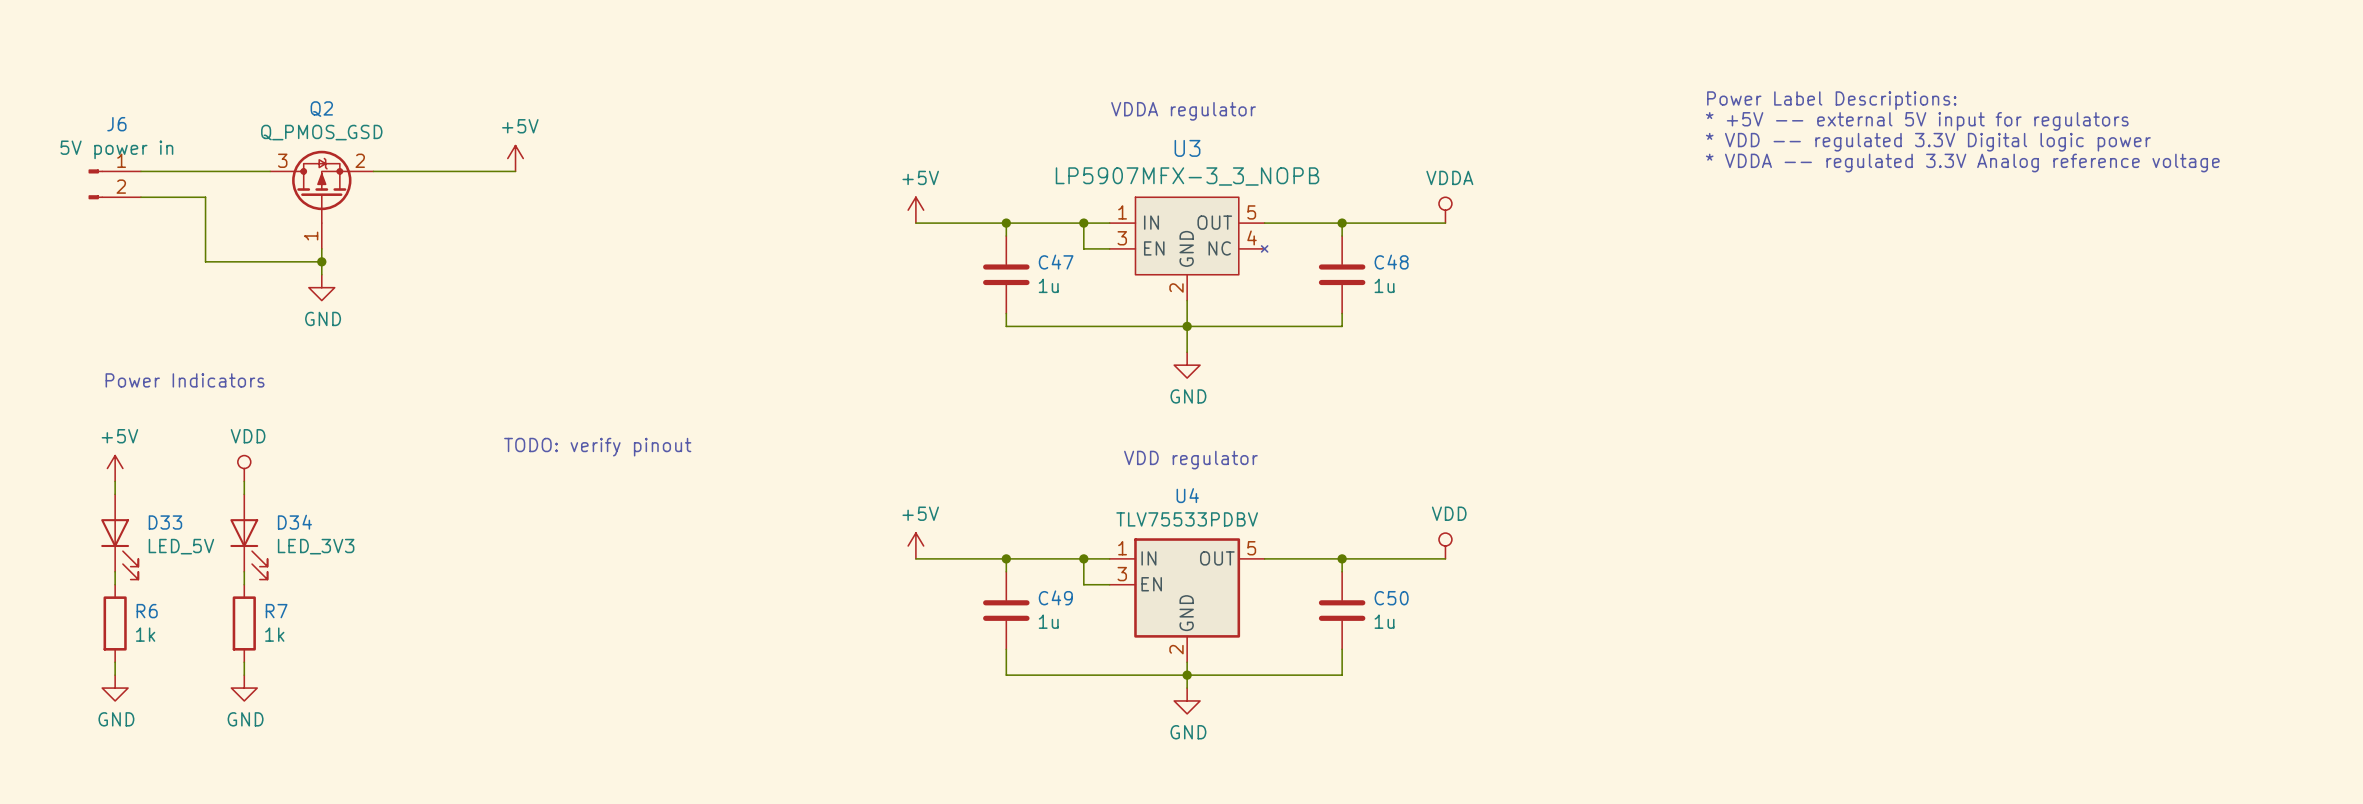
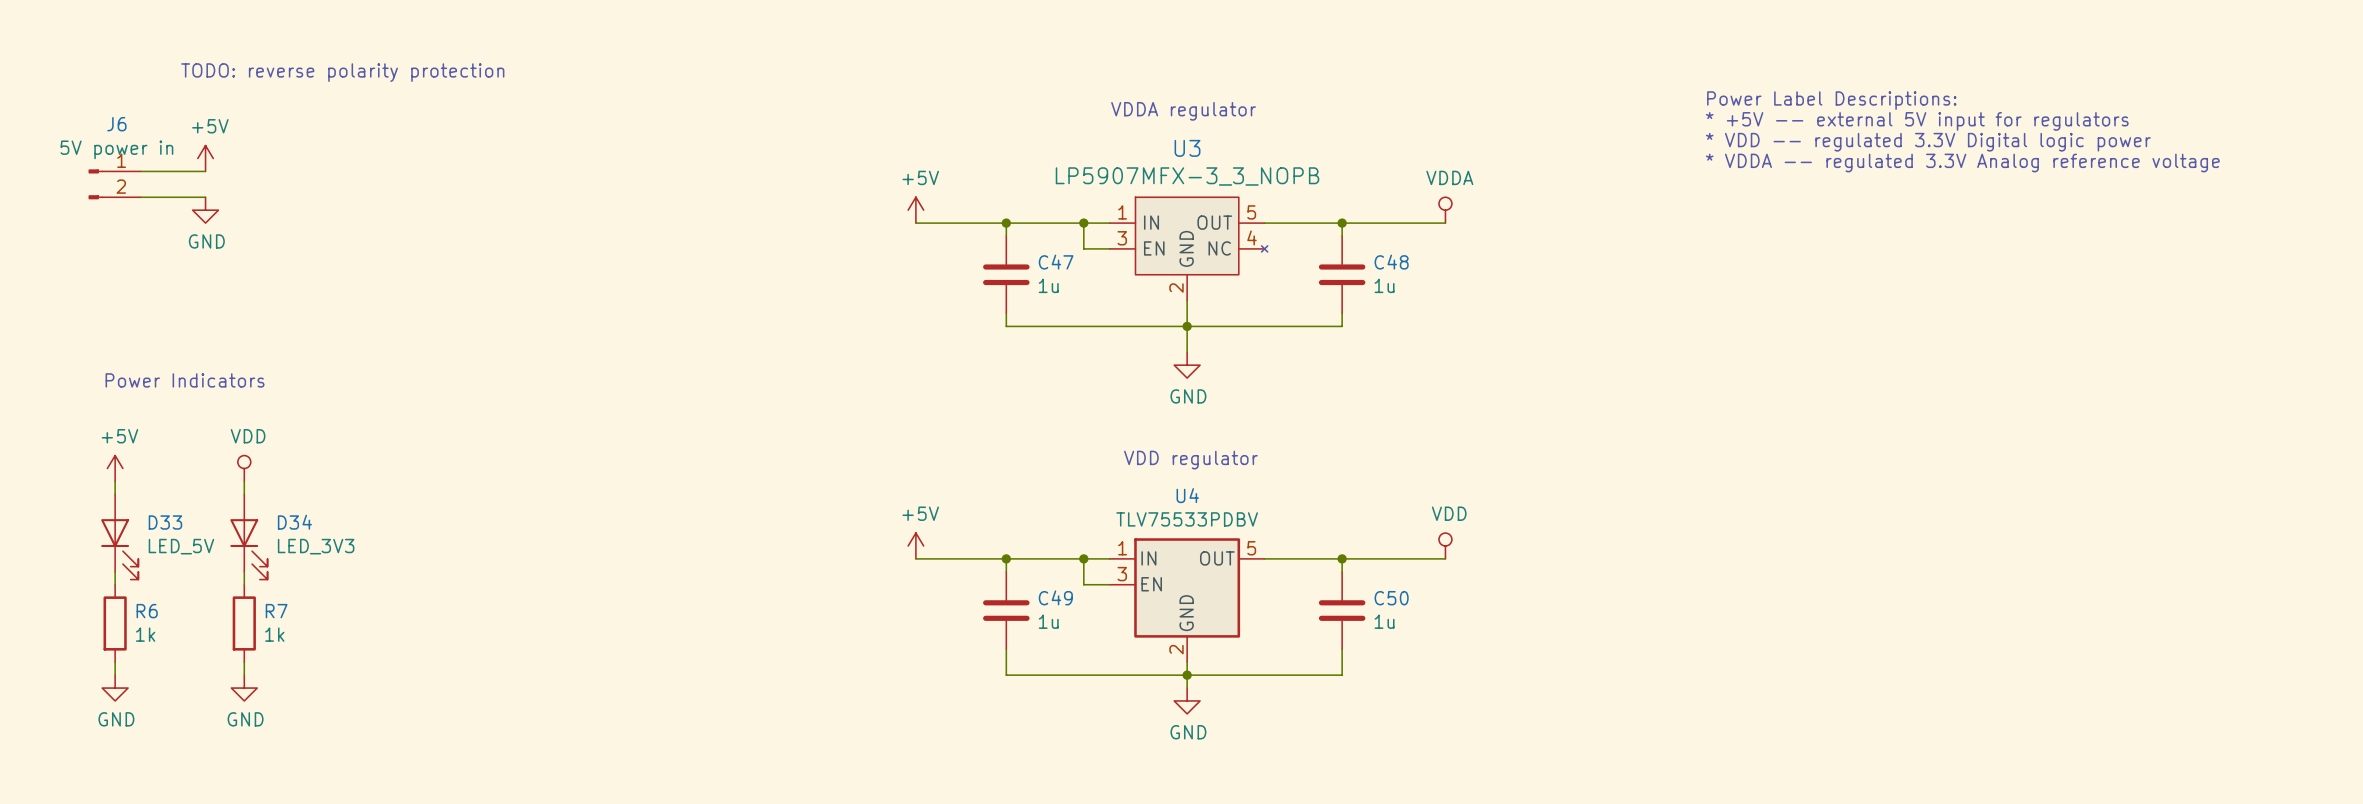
text: none -> TODO: reverse polarity protection (342, 72)
power symbol: none -> +5V (205, 158)
power symbol: +5V (515, 158) -> none
wire: (205, 171) (270, 171) -> none
wire: (373, 171) (515, 171) -> none
wire: (205, 197) (205, 261) (321, 261) -> none
Q2: Q_PMOS_GSD (321, 199) -> none
wire: (321, 248) (321, 274) -> none
junction: (321, 261) -> none
power symbol position: GND (321, 287) -> GND (205, 210)
text: TODO: verify pinout (597, 447) -> none

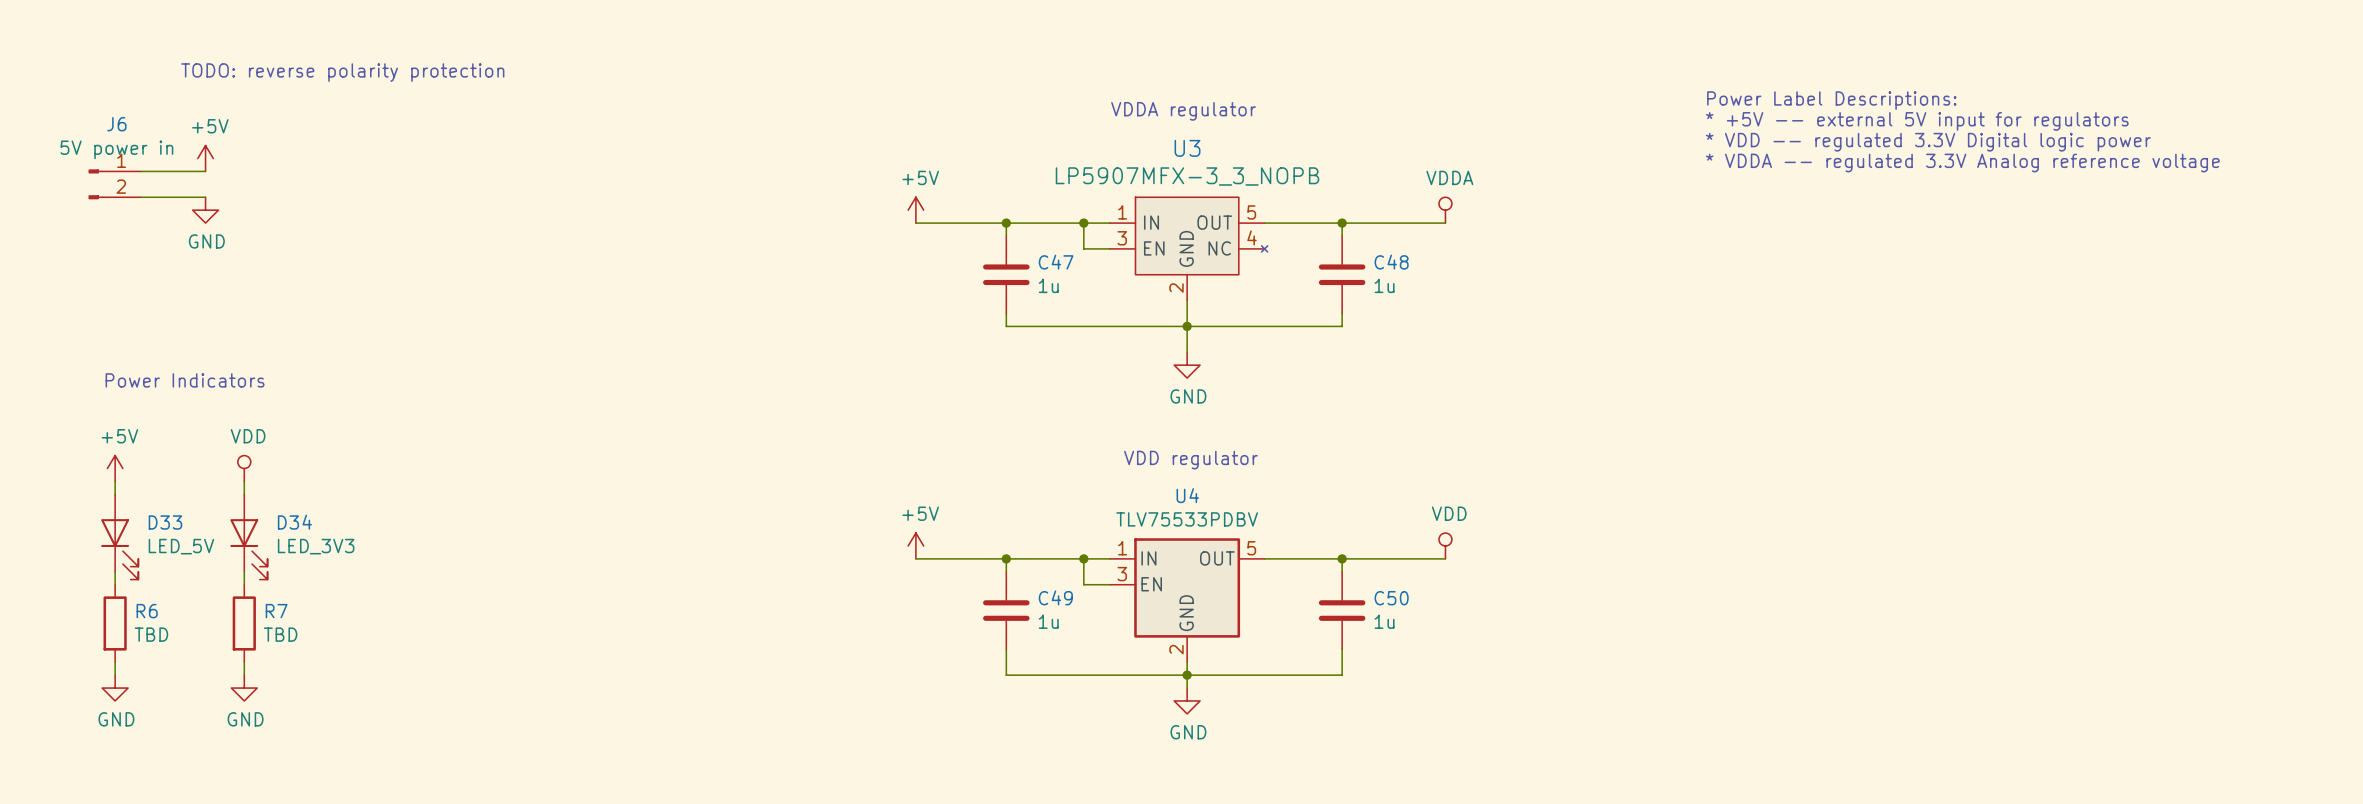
R6 value: 1k (145, 634) -> TBD (151, 634)
R7 value: 1k (274, 634) -> TBD (280, 634)

